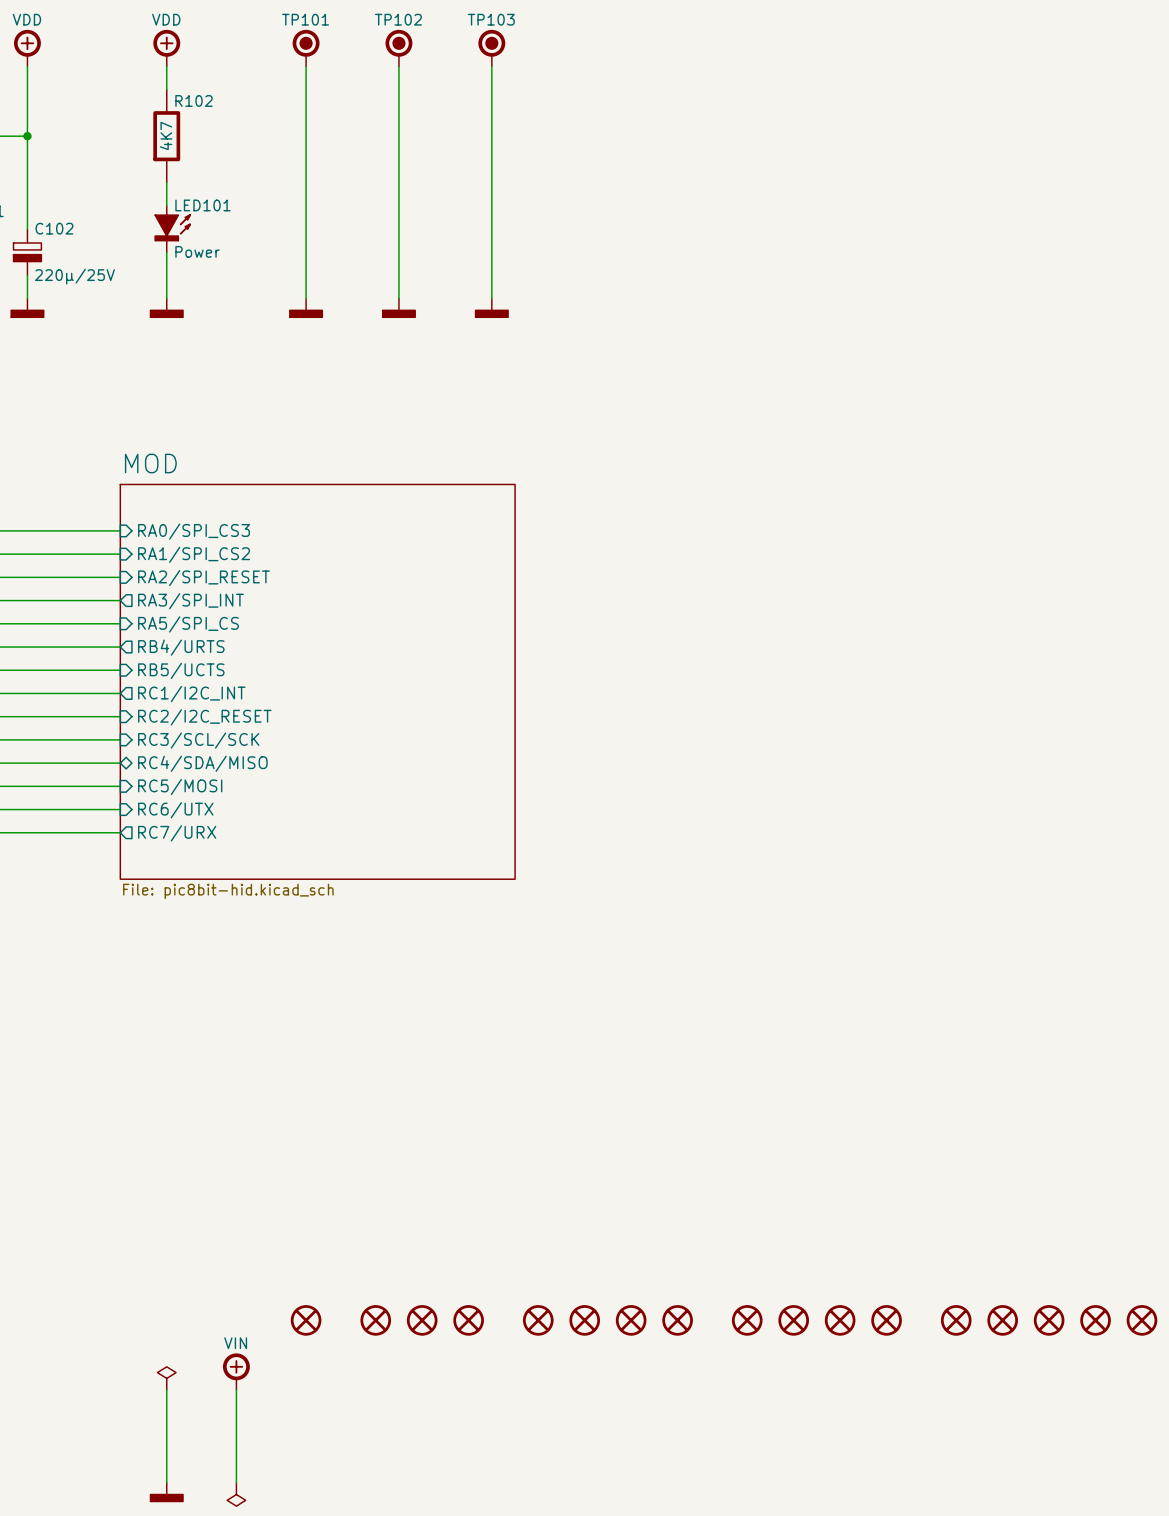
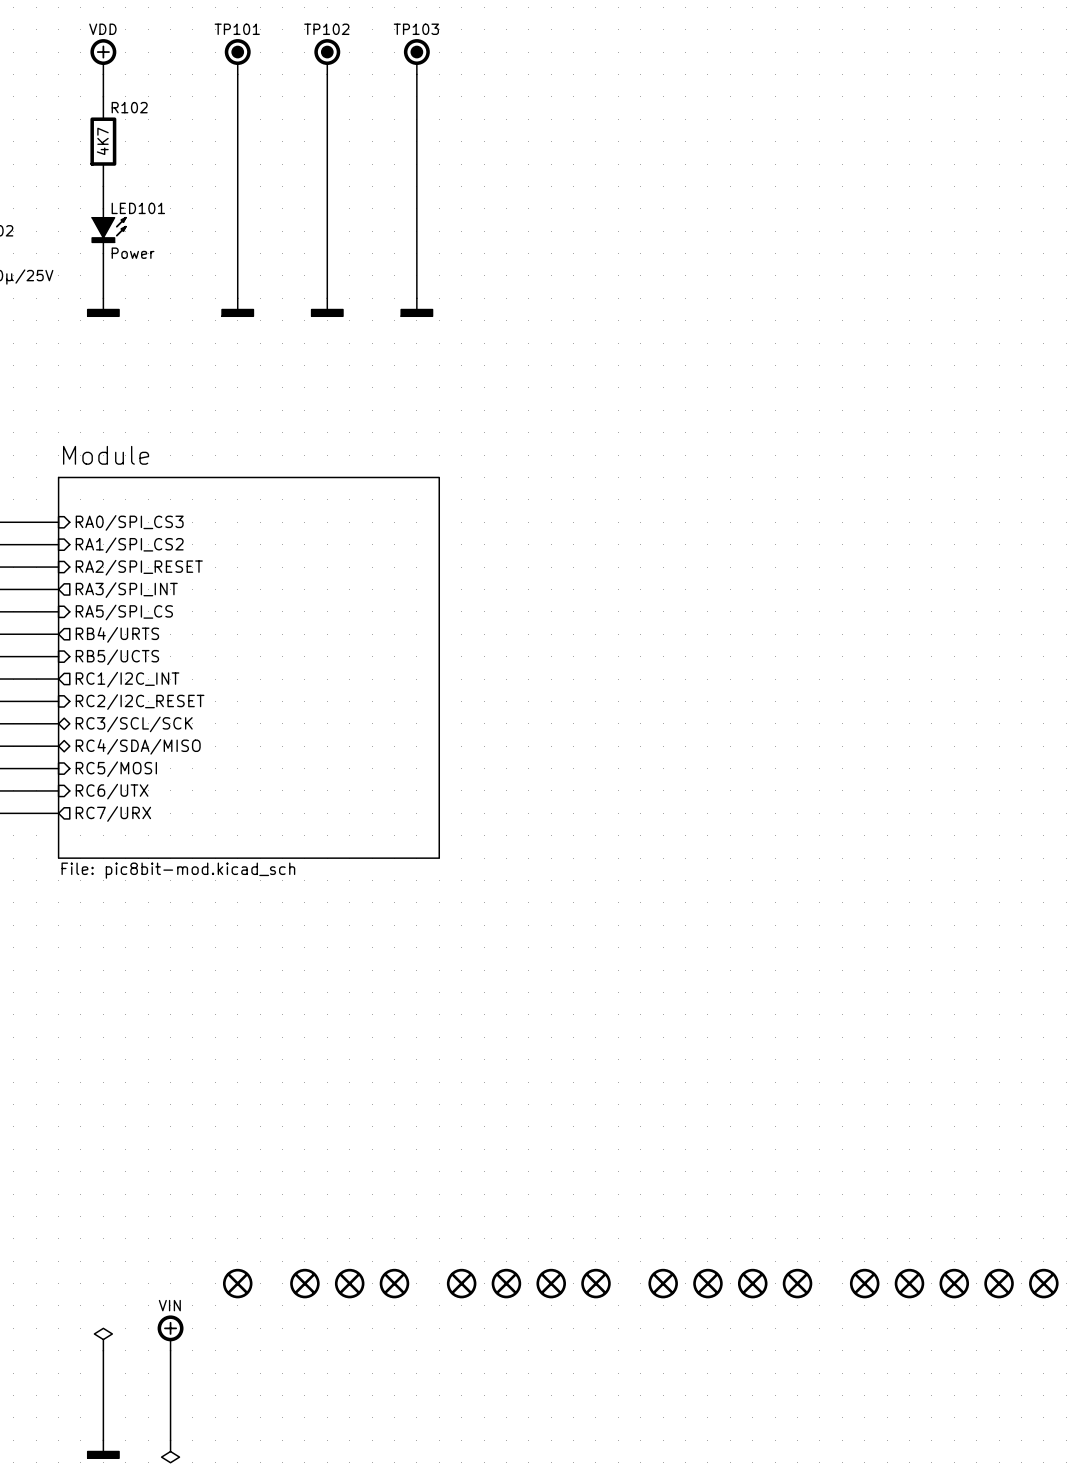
sheet MOD name: MOD (150, 463) -> Module (106, 455)
sheet pin shape: input (198, 740) -> bidirectional (134, 724)
sheet MOD value: File: pic8bit-hid.kicad_sch (228, 891) -> File: pic8bit-mod.kicad_sch (178, 870)

